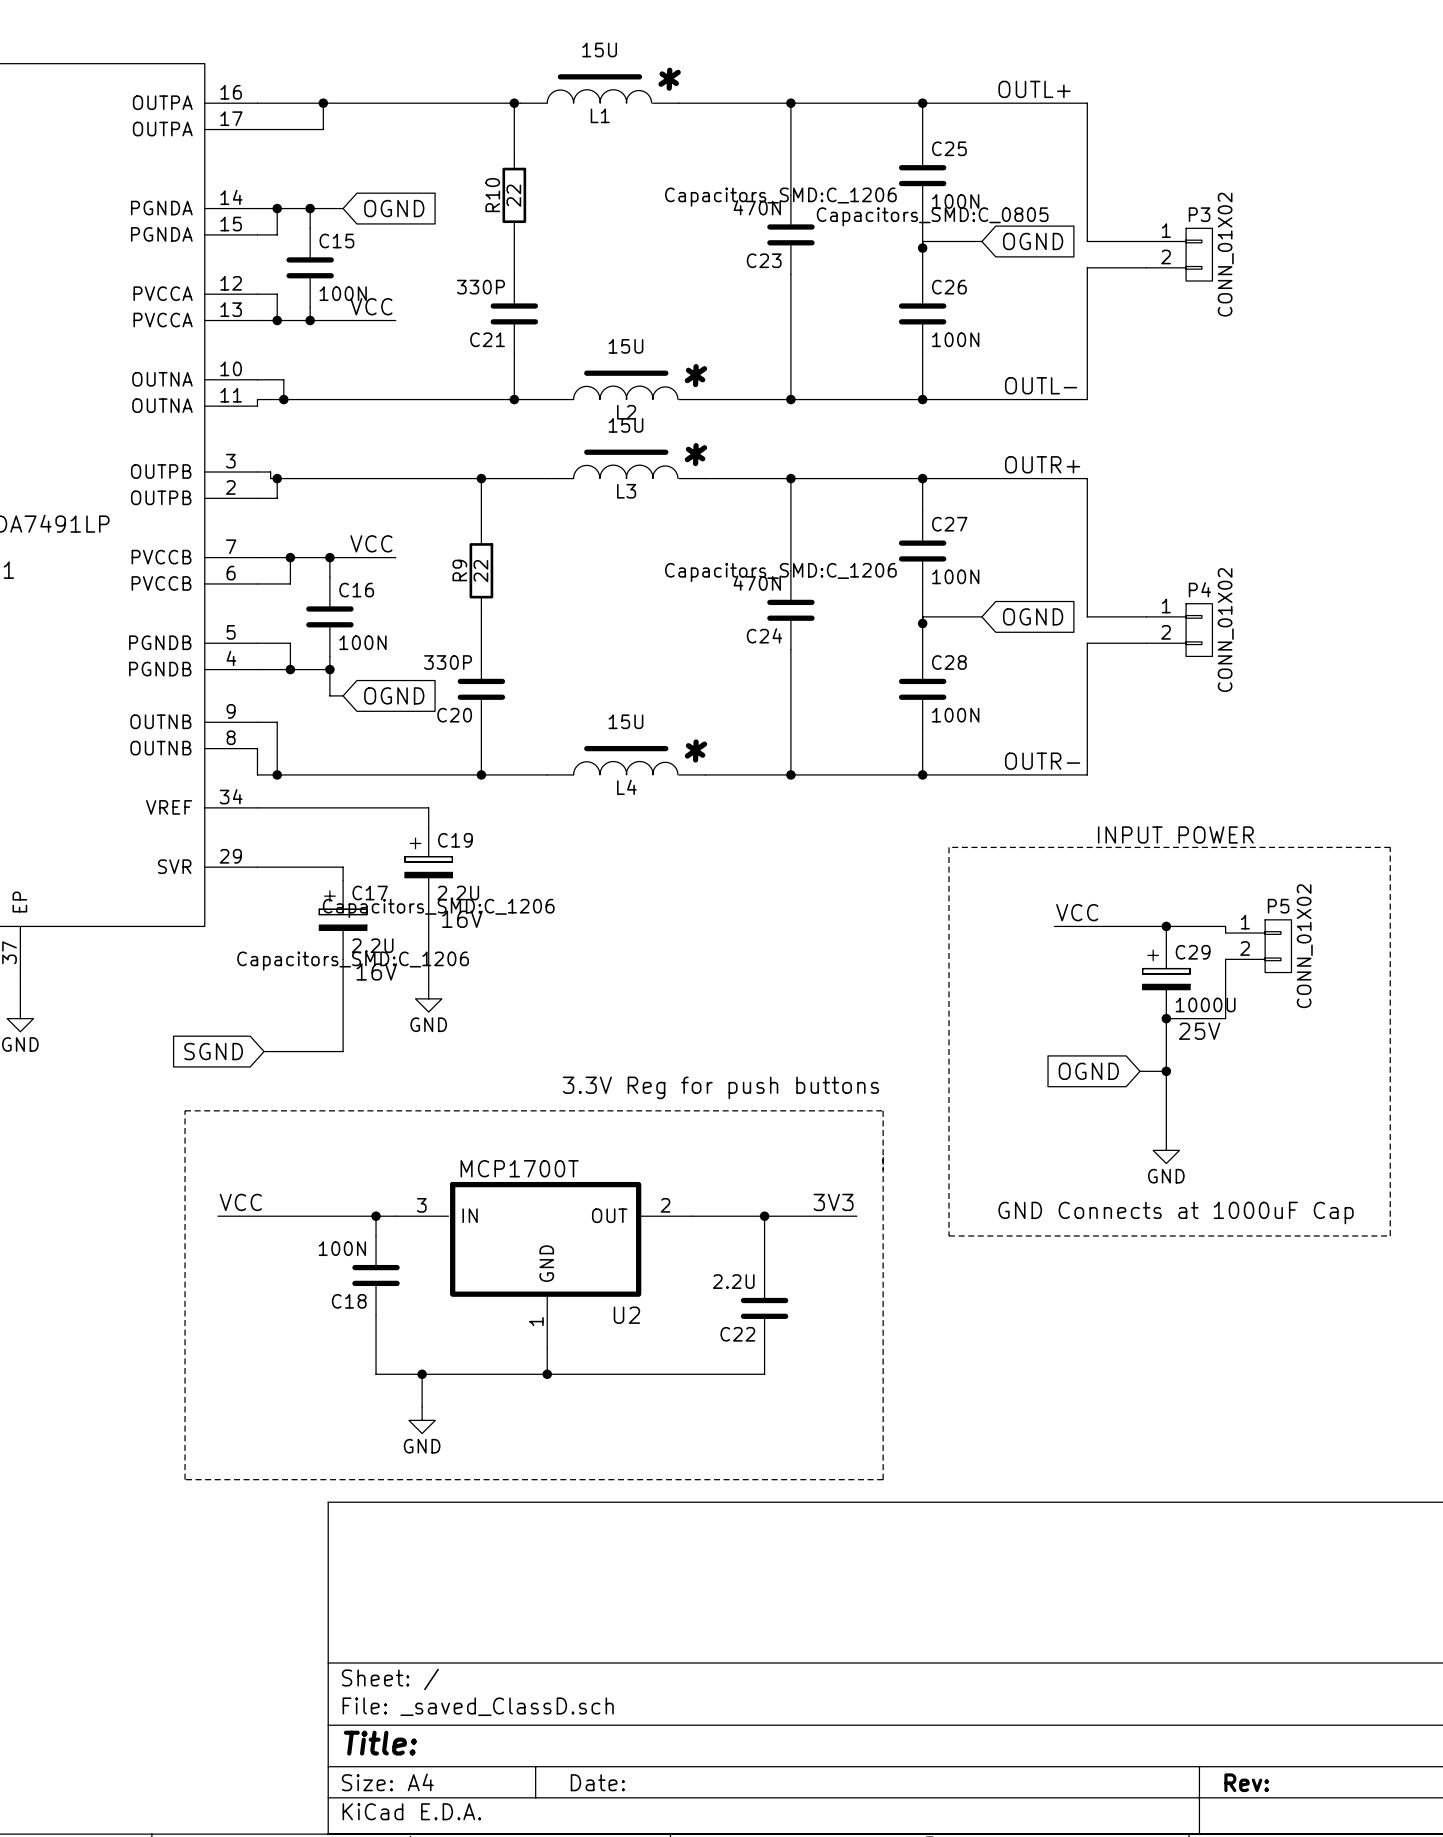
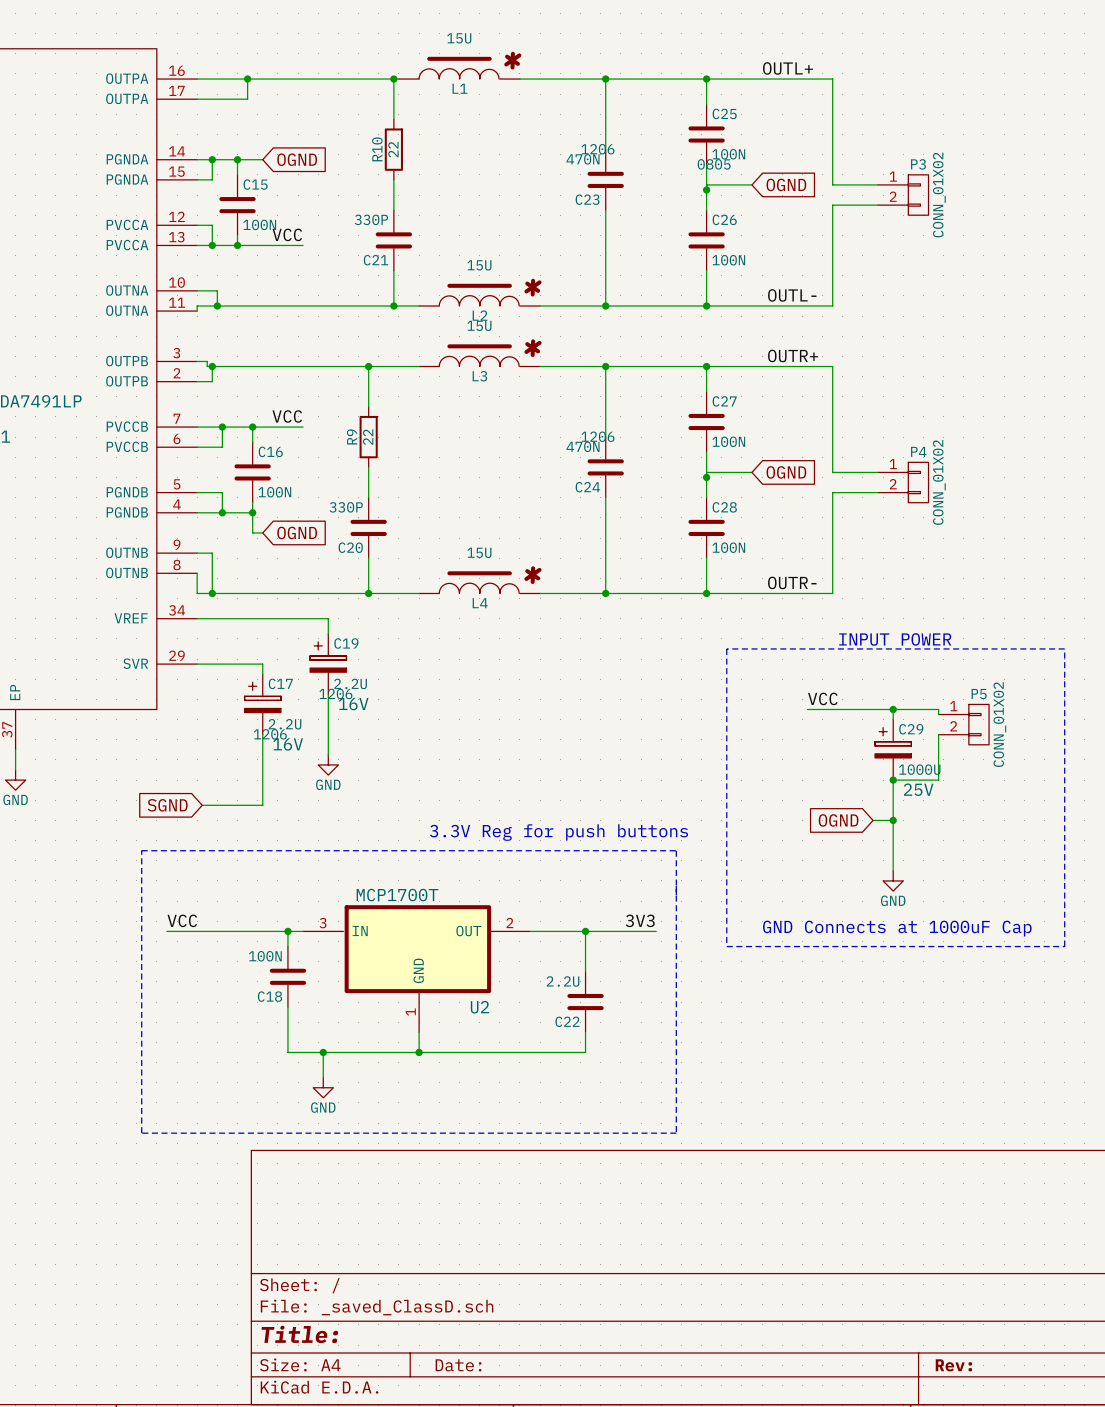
C23 text: Capacitors_SMD:C_1206 (780, 197) -> 1206 (597, 149)
C25 text: Capacitors_SMD:C_0805 (932, 216) -> 0805 (714, 164)
C24 text: Capacitors_SMD:C_1206 (780, 572) -> 1206 (597, 436)
C19 text: Capacitors_SMD:C_1206 (438, 908) -> 1206 (335, 693)
C17 text: Capacitors_SMD:C_1206 (353, 961) -> 1206 (270, 734)

